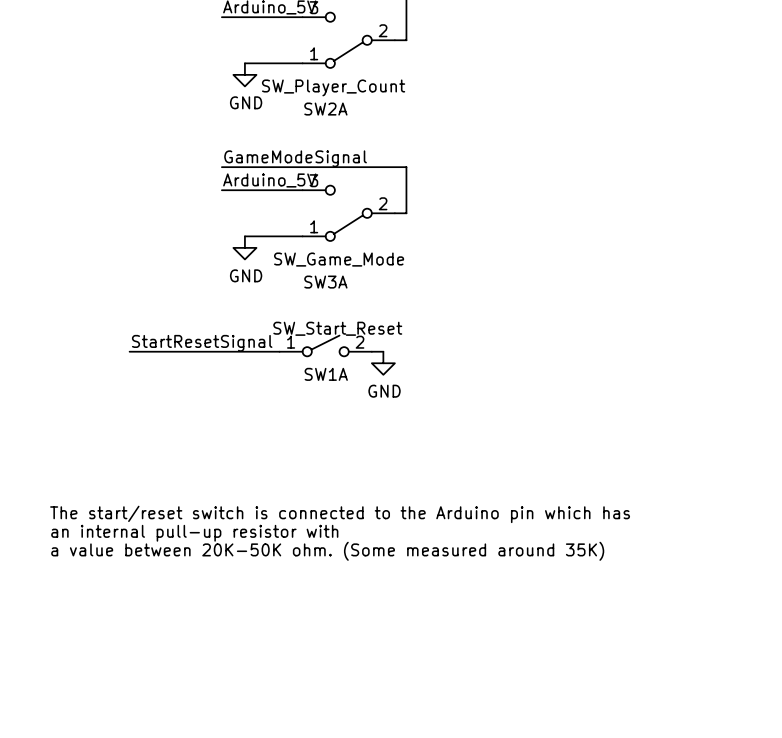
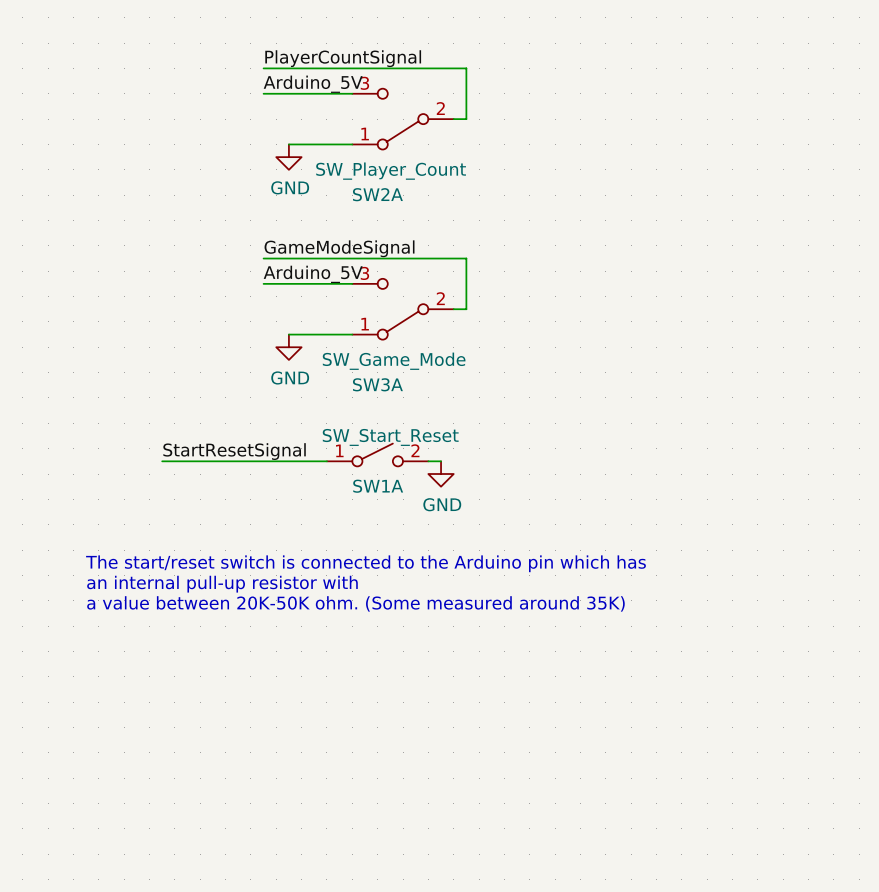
text position: The start/reset switch is connected to the Arduino pin which has (340, 514) -> The start/reset switch is connected to the Arduino pin which has (365, 563)
text position: an internal pull-up resistor with (194, 533) -> an internal pull-up resistor with (222, 584)
text position: a value between 20K-50K ohm. (Some measured around 35K) (327, 551) -> a value between 20K-50K ohm. (Some measured around 35K) (355, 603)

